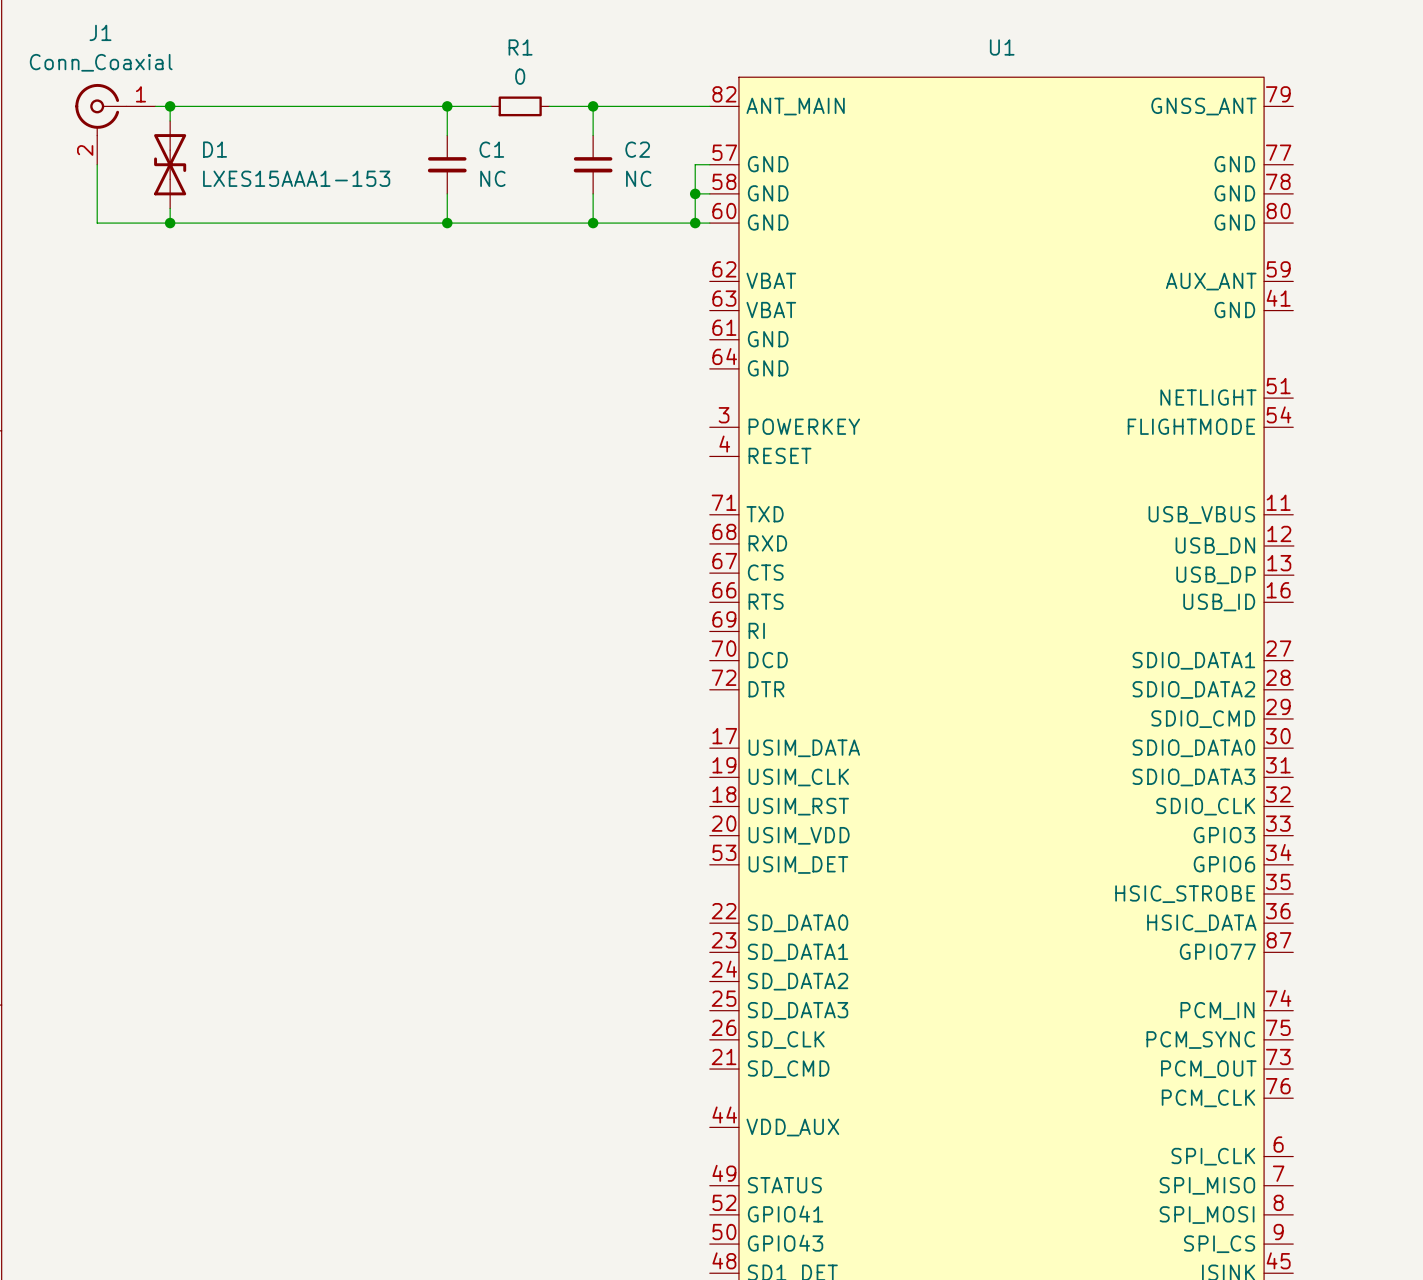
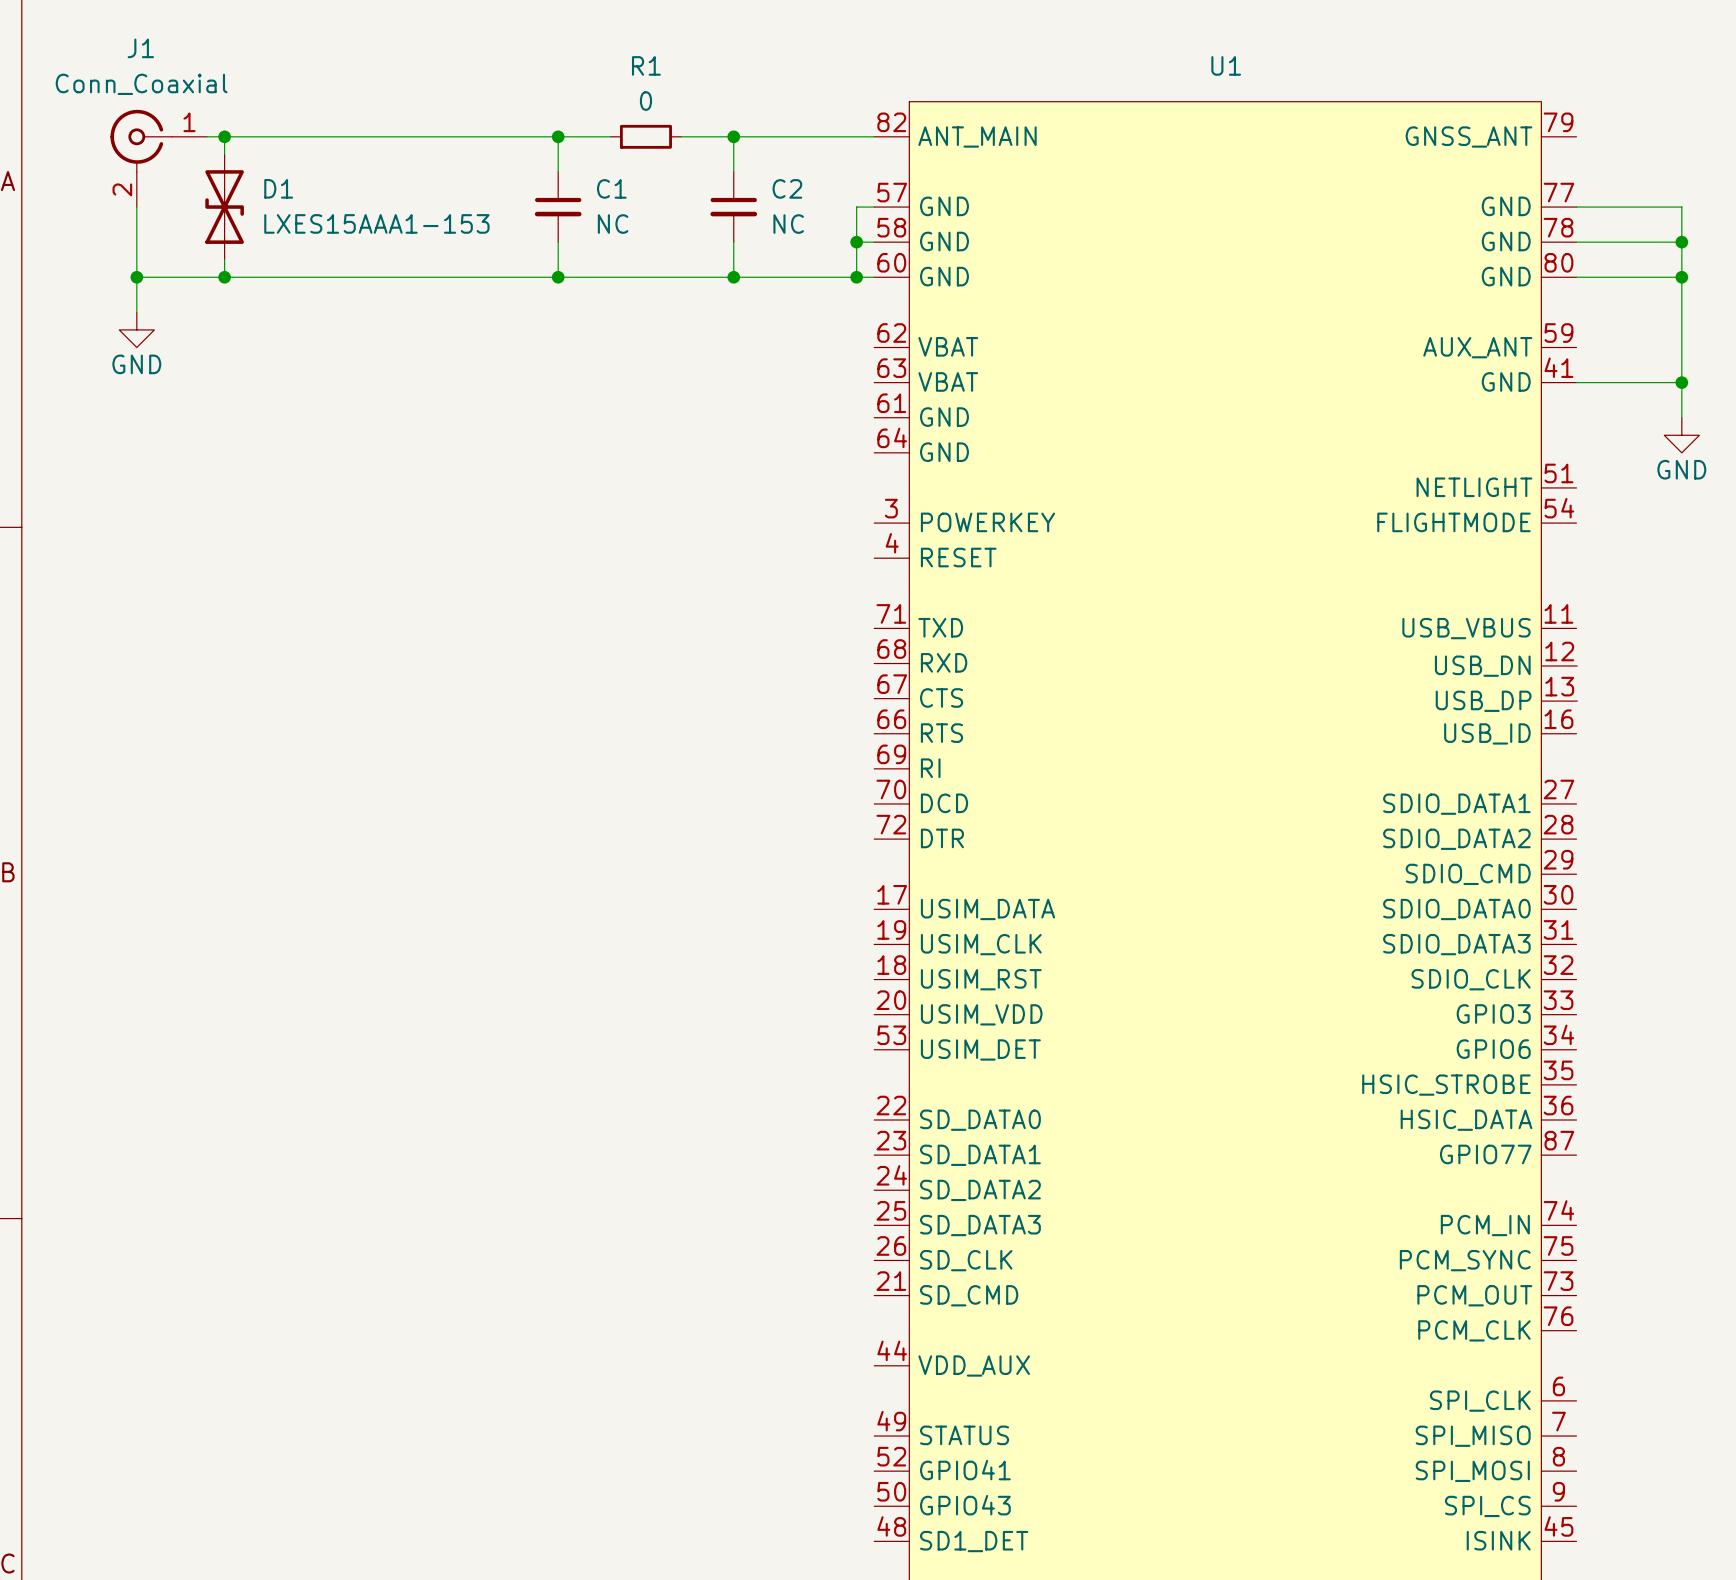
wire: none -> (1576, 207) (1681, 207) (1681, 417)
wire: none -> (1576, 242) (1681, 242)
junction: none -> (1681, 242)
wire: none -> (136, 277) (136, 312)
junction: none -> (136, 277)
wire: none -> (1576, 277) (1681, 277)
junction: none -> (1681, 277)
power symbol: none -> GND (136, 329)
wire: none -> (1576, 382) (1681, 382)
junction: none -> (1681, 382)
power symbol: none -> GND (1681, 435)

